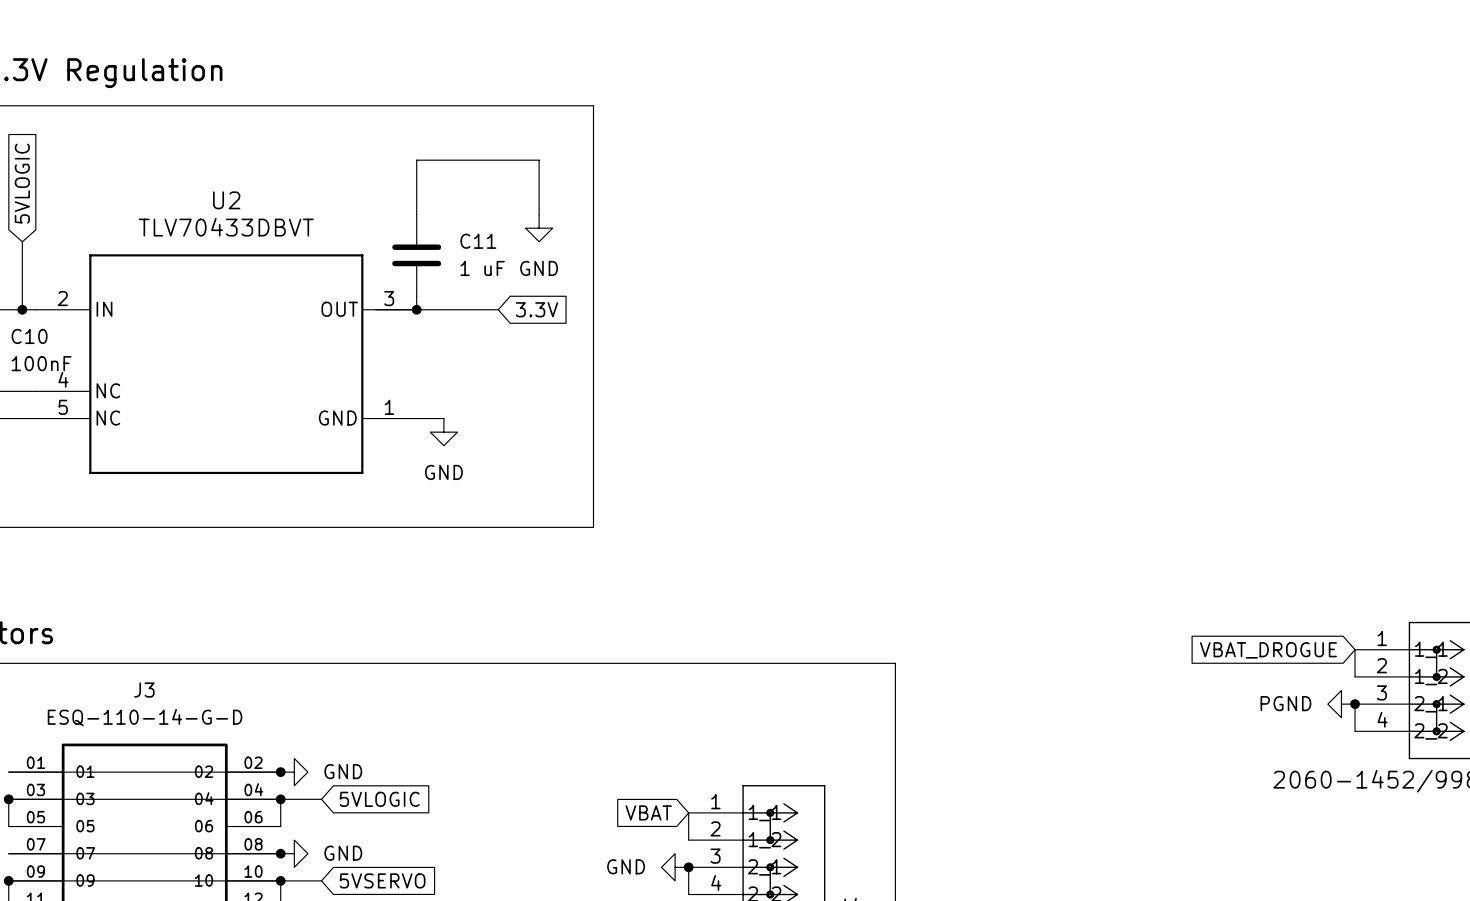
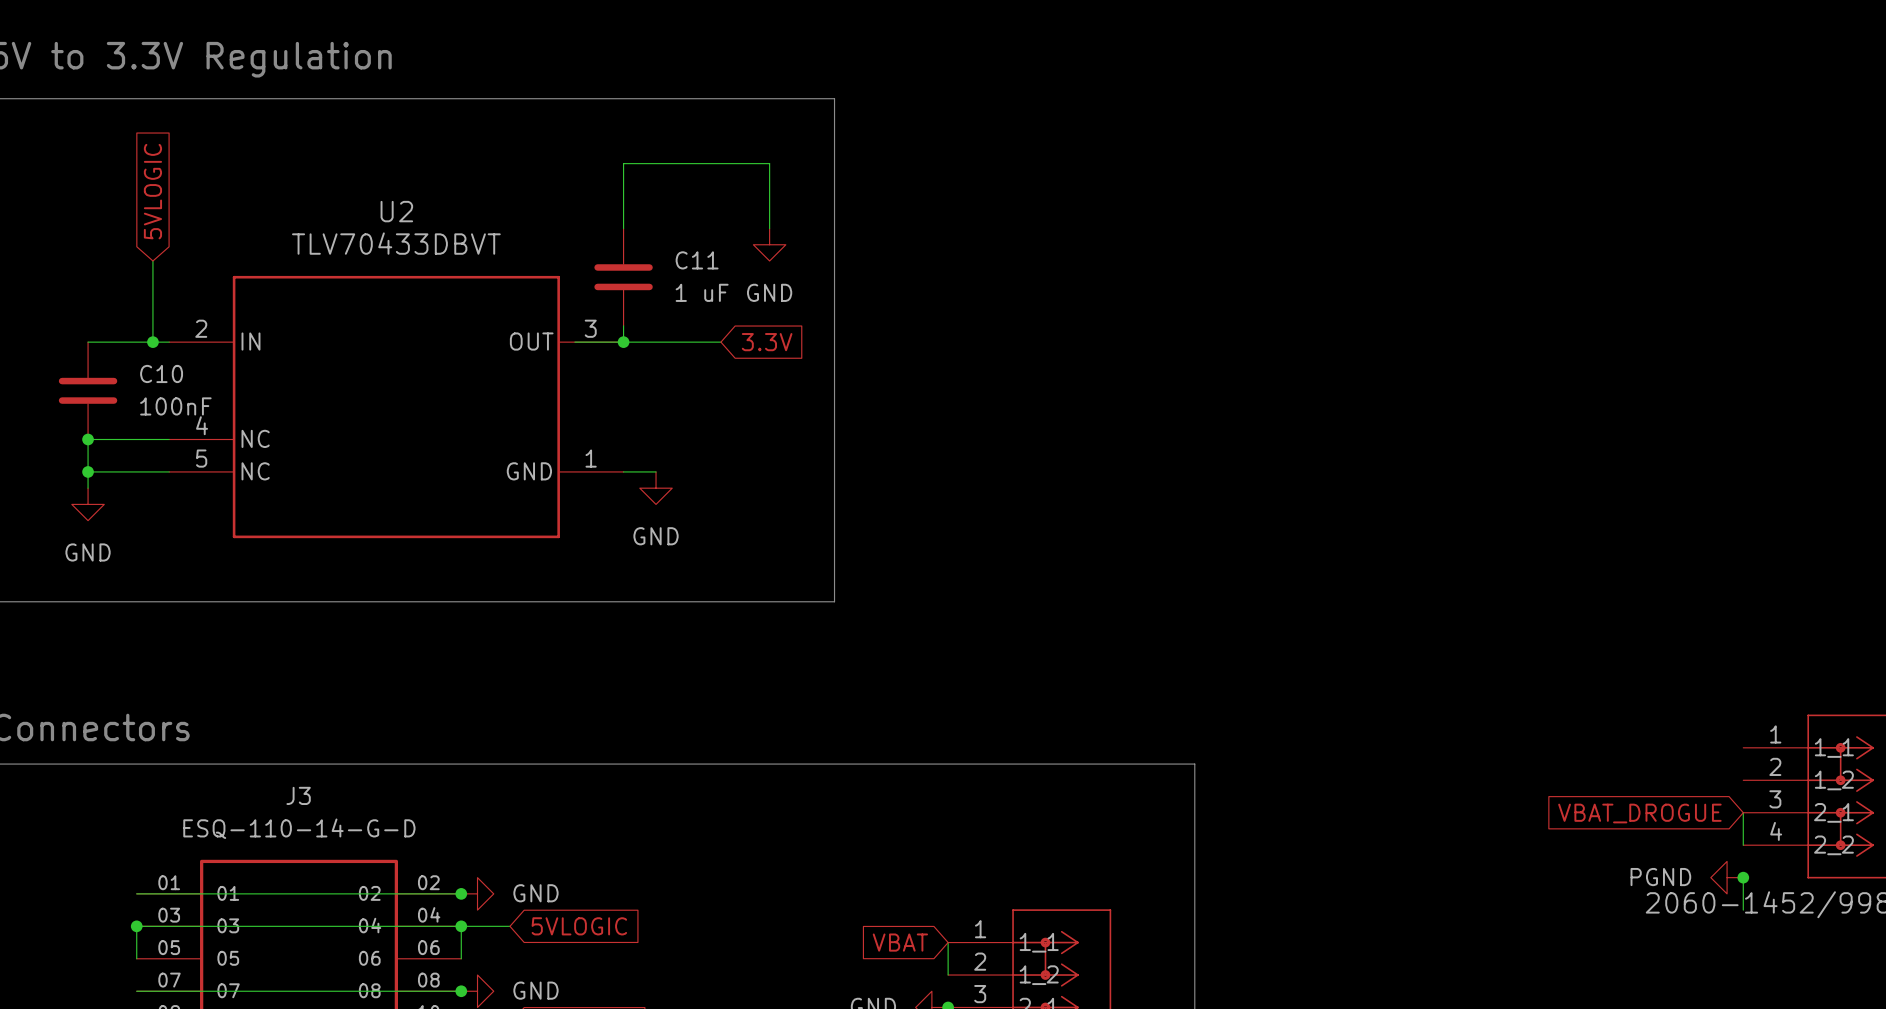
wire: (1355, 649) (1355, 676) -> (1743, 877) (1743, 910)
global label position: VBAT_DROGUE (1268, 650) -> VBAT_DROGUE (1639, 813)
power symbol position: PGND (1341, 704) -> PGND (1727, 877)
junction position: (1355, 704) -> (1743, 877)

